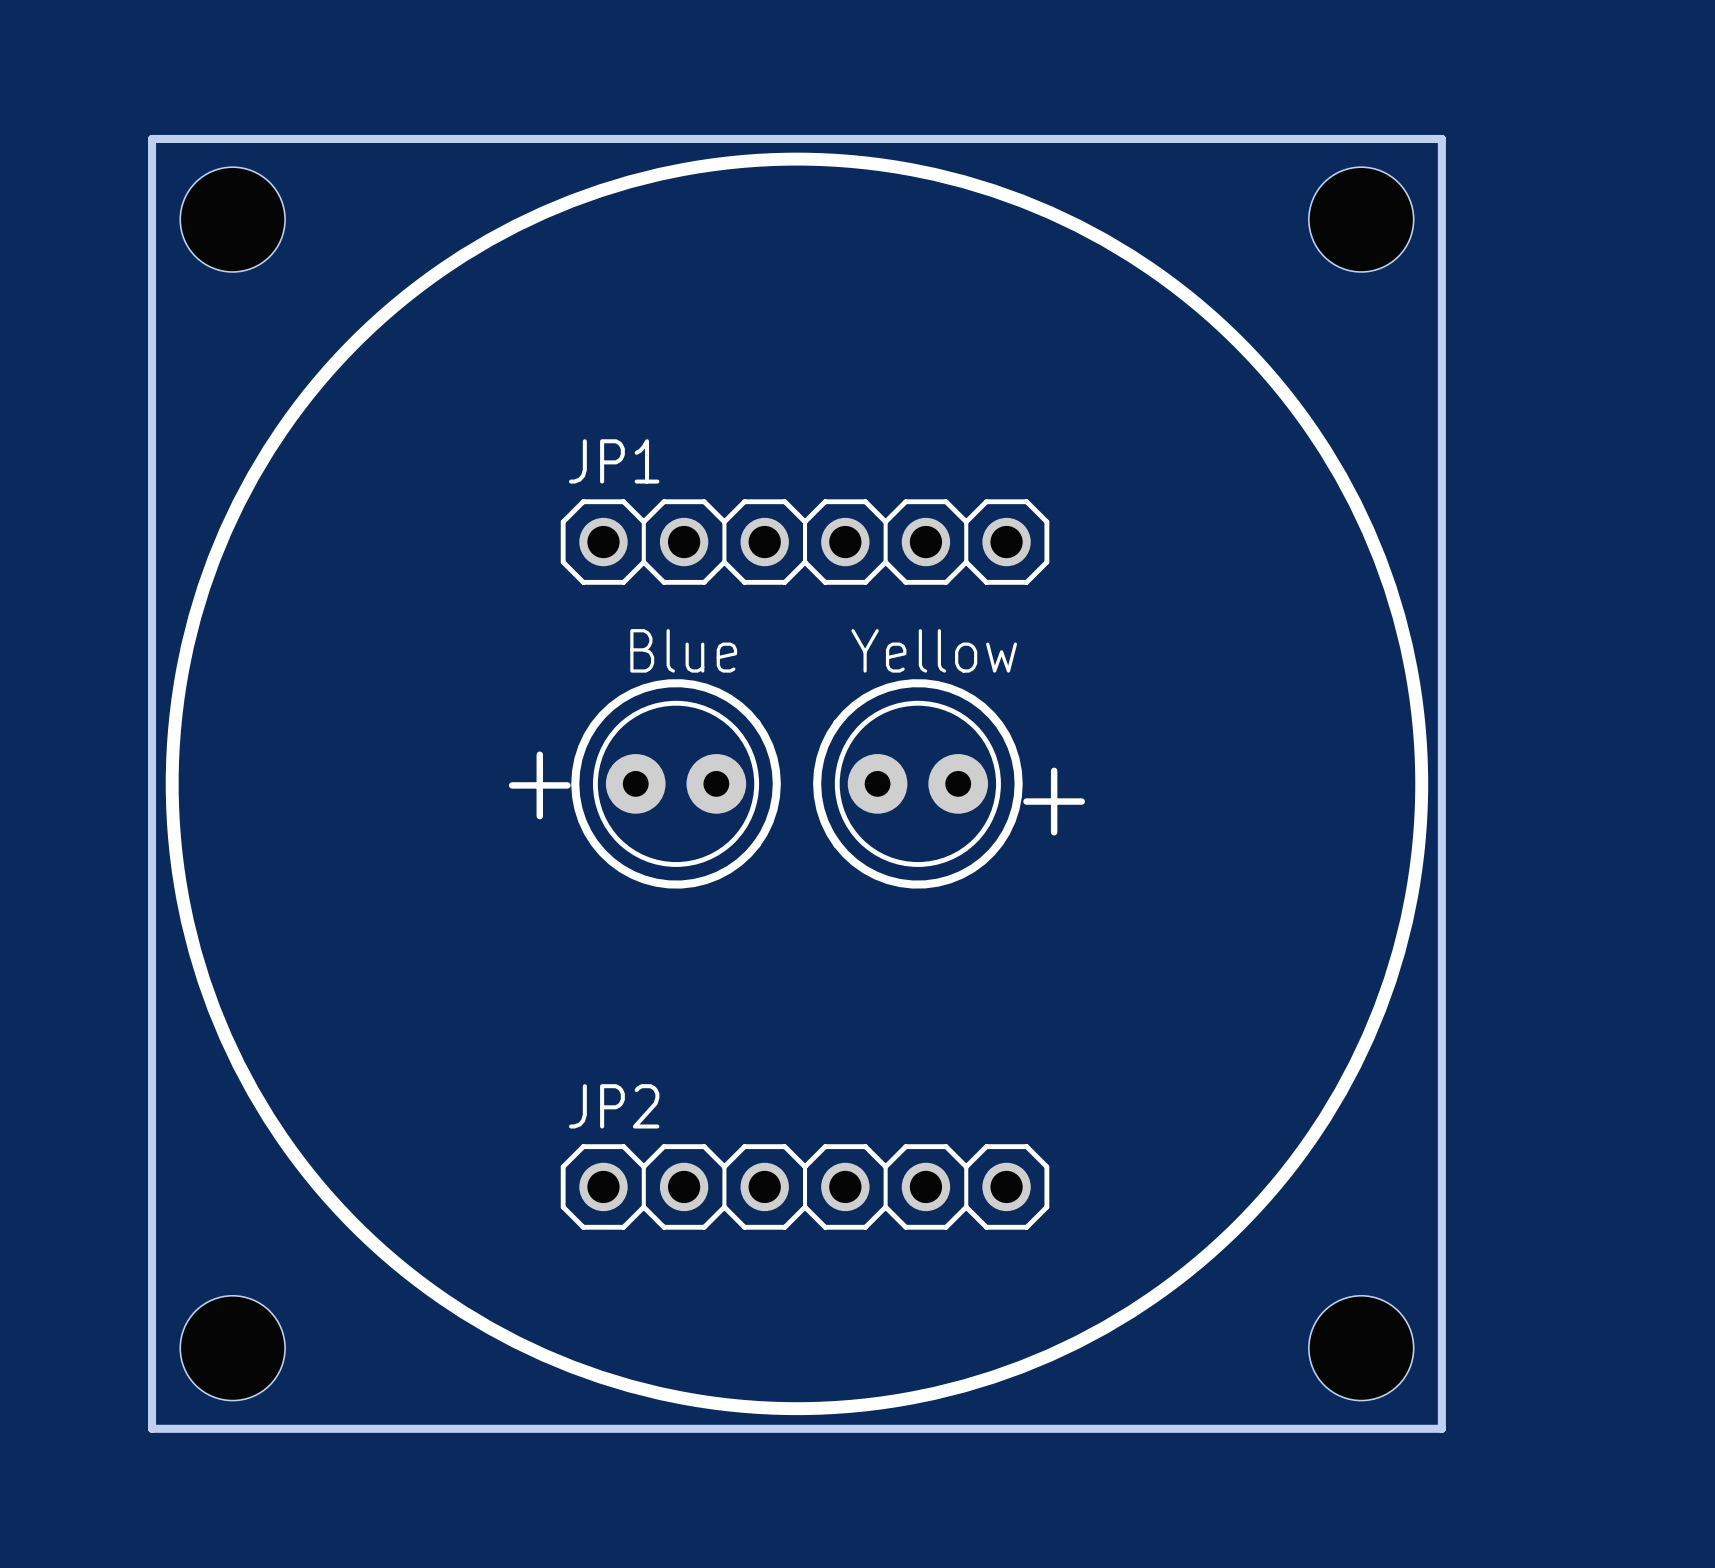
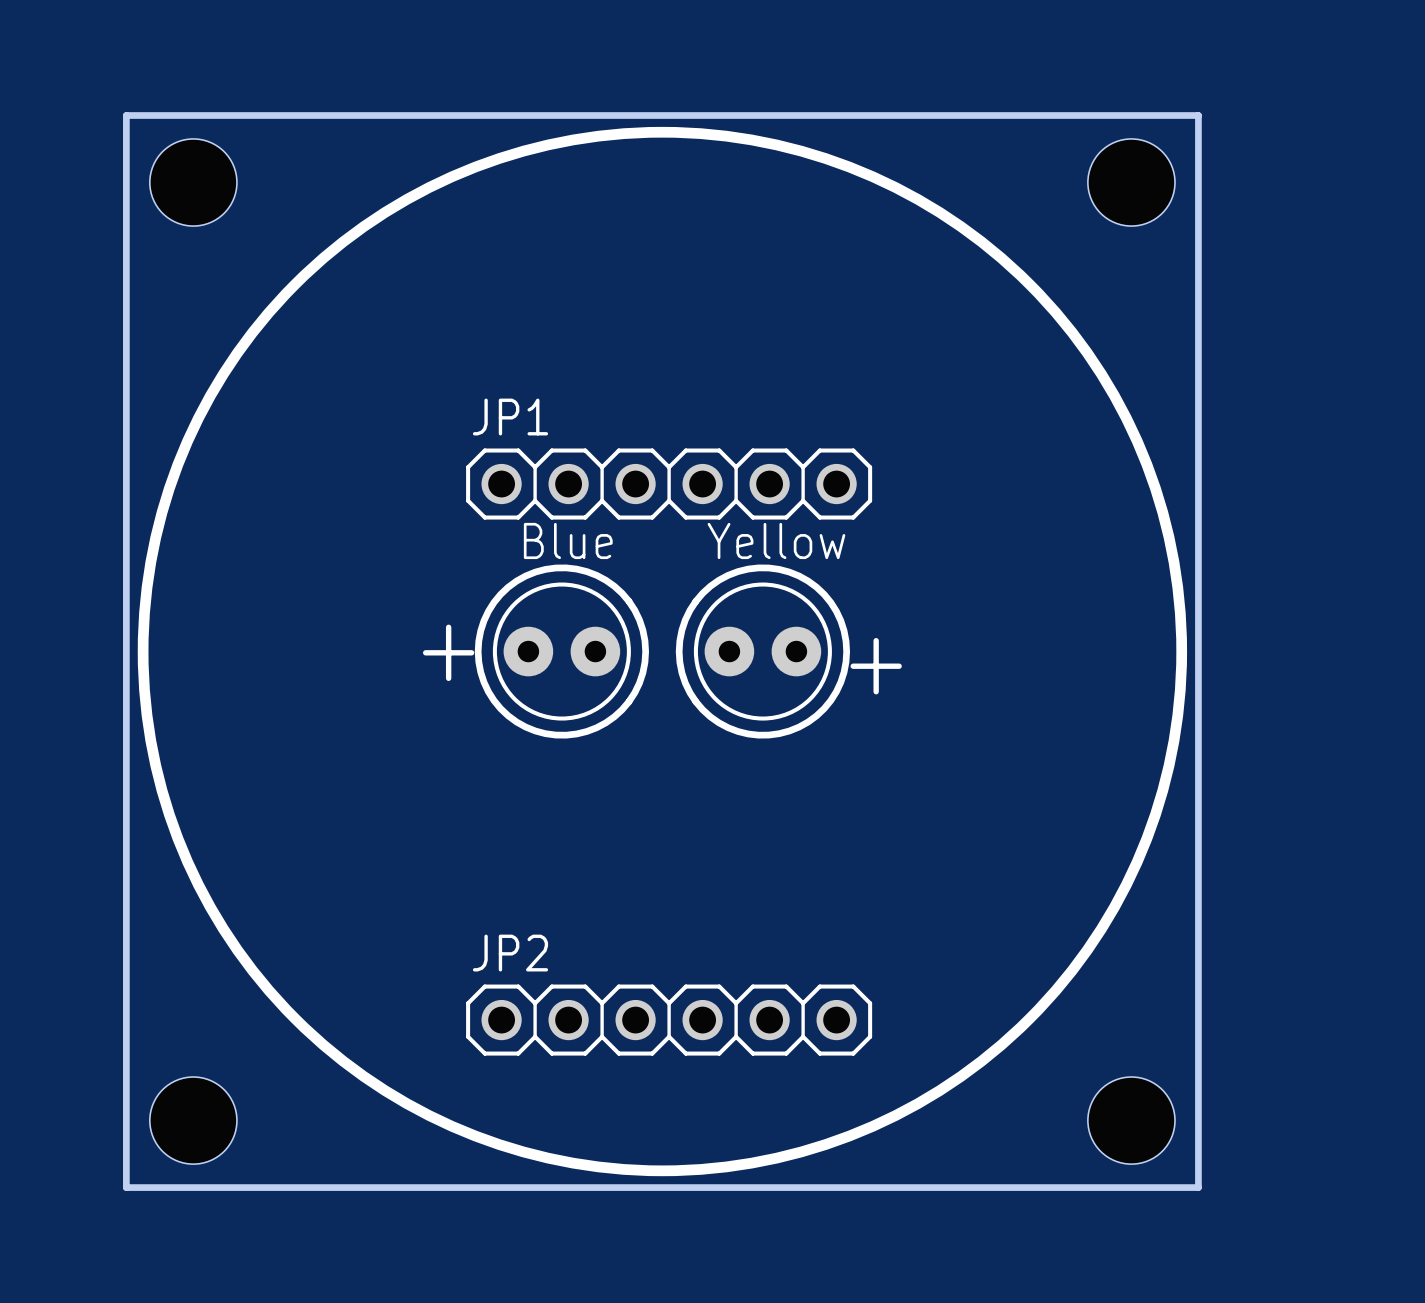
JP1 position: (805, 542) -> (669, 484)
JP2 position: (805, 1186) -> (669, 1020)

